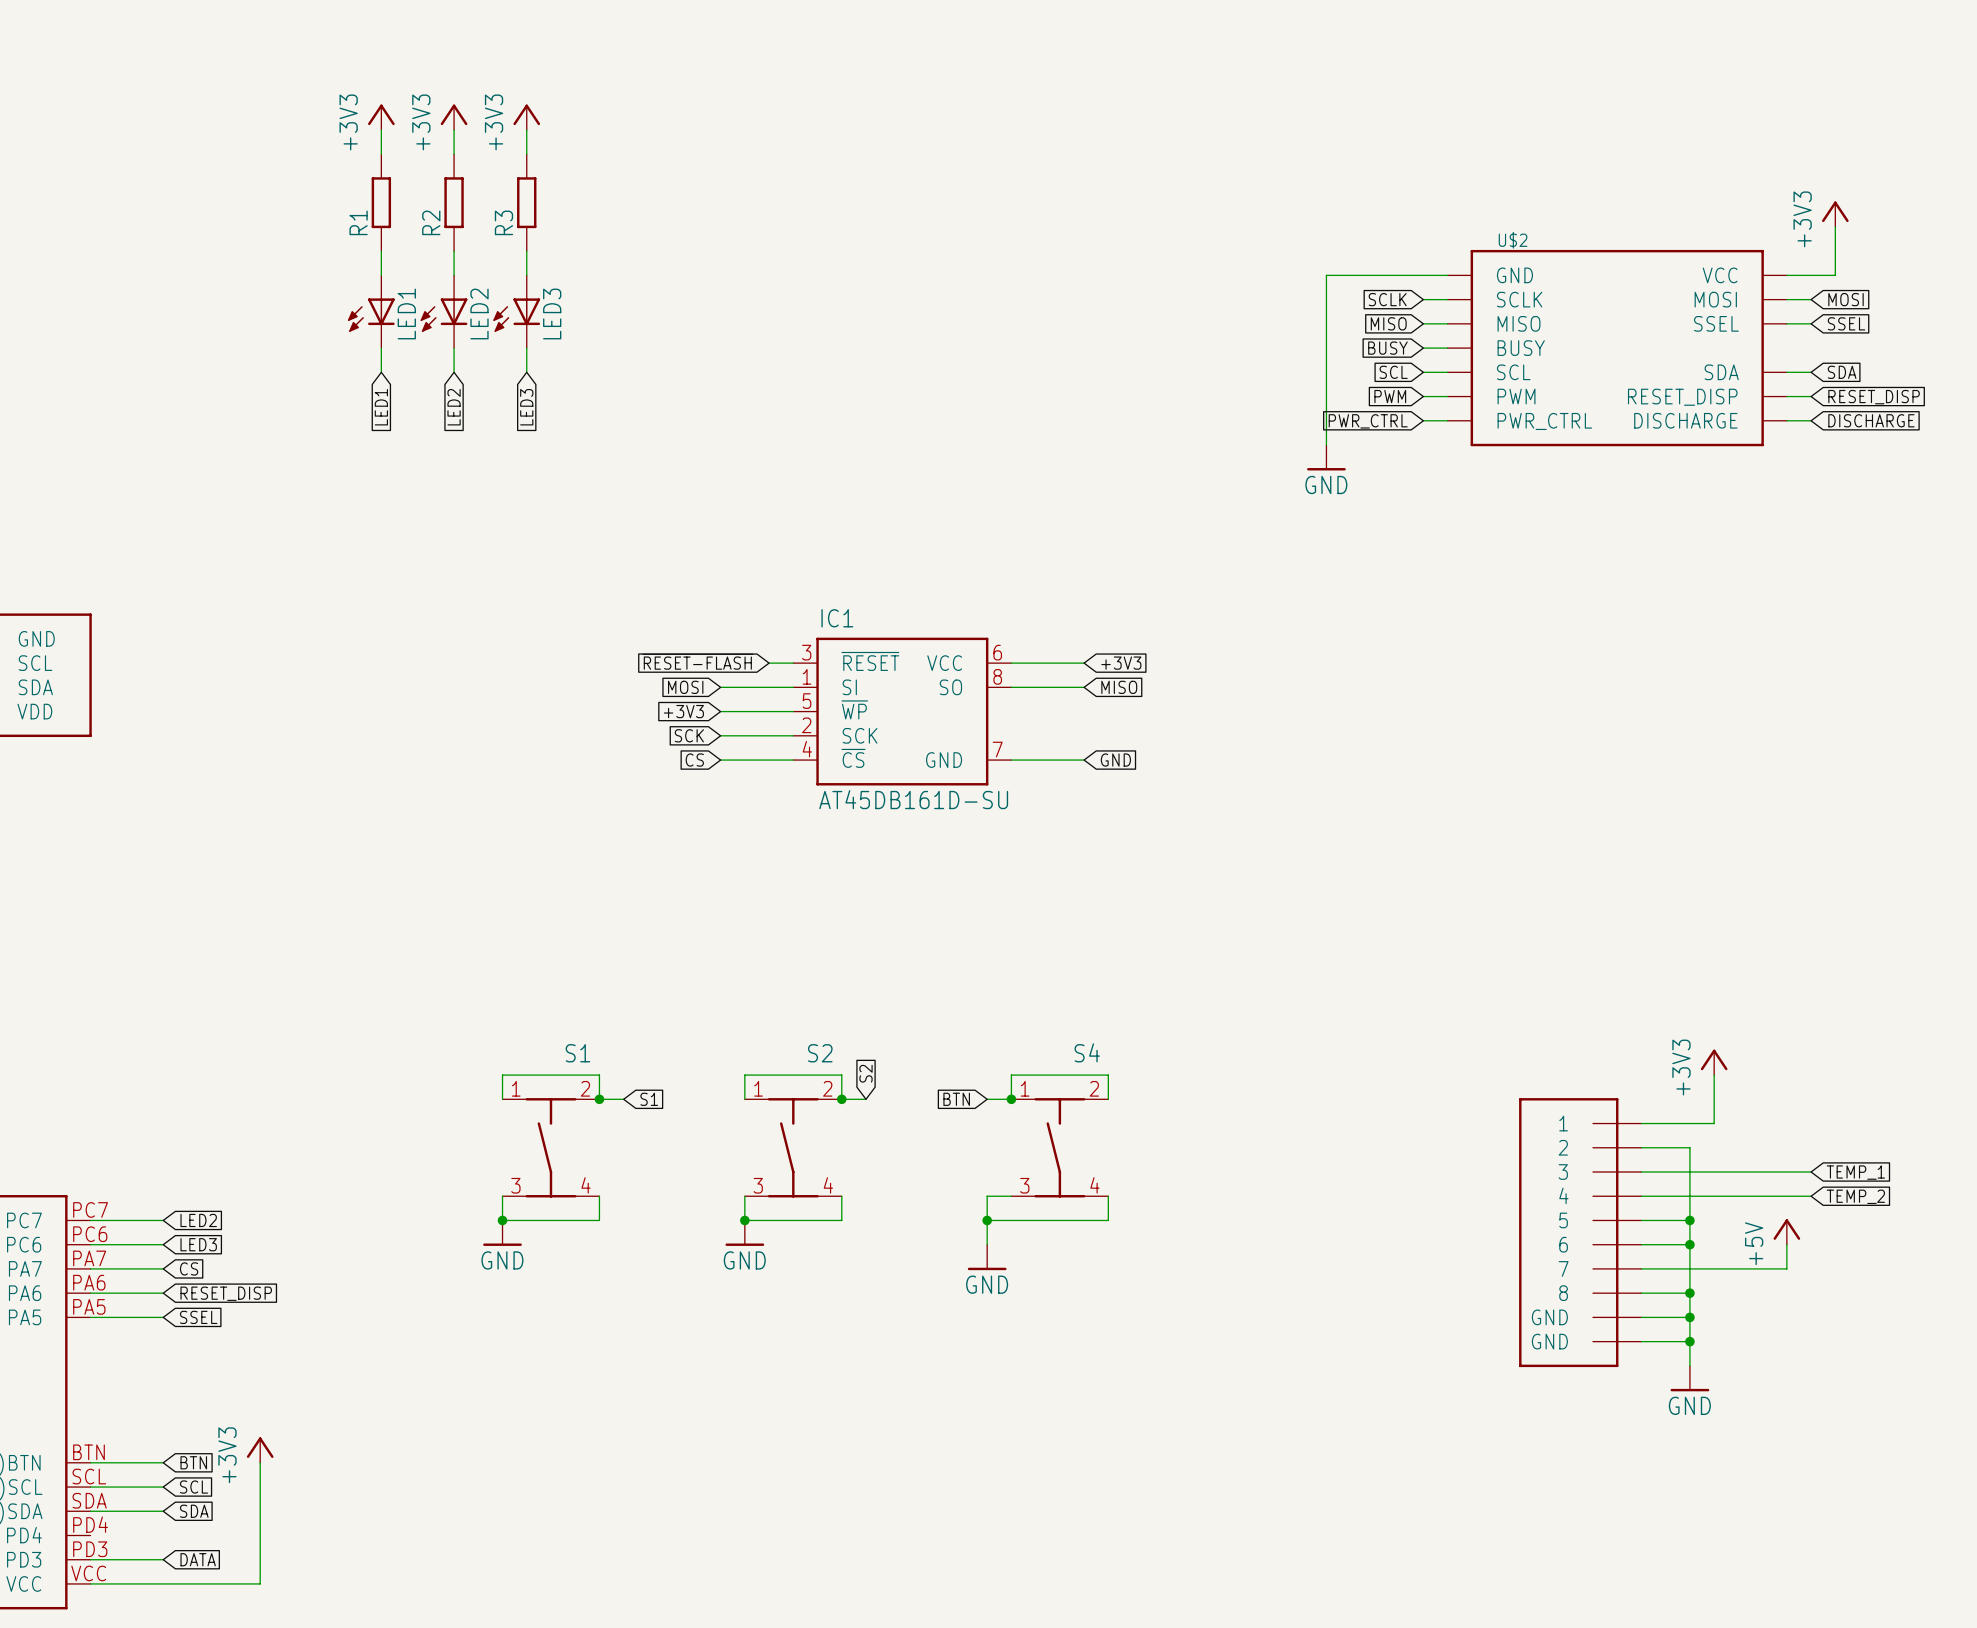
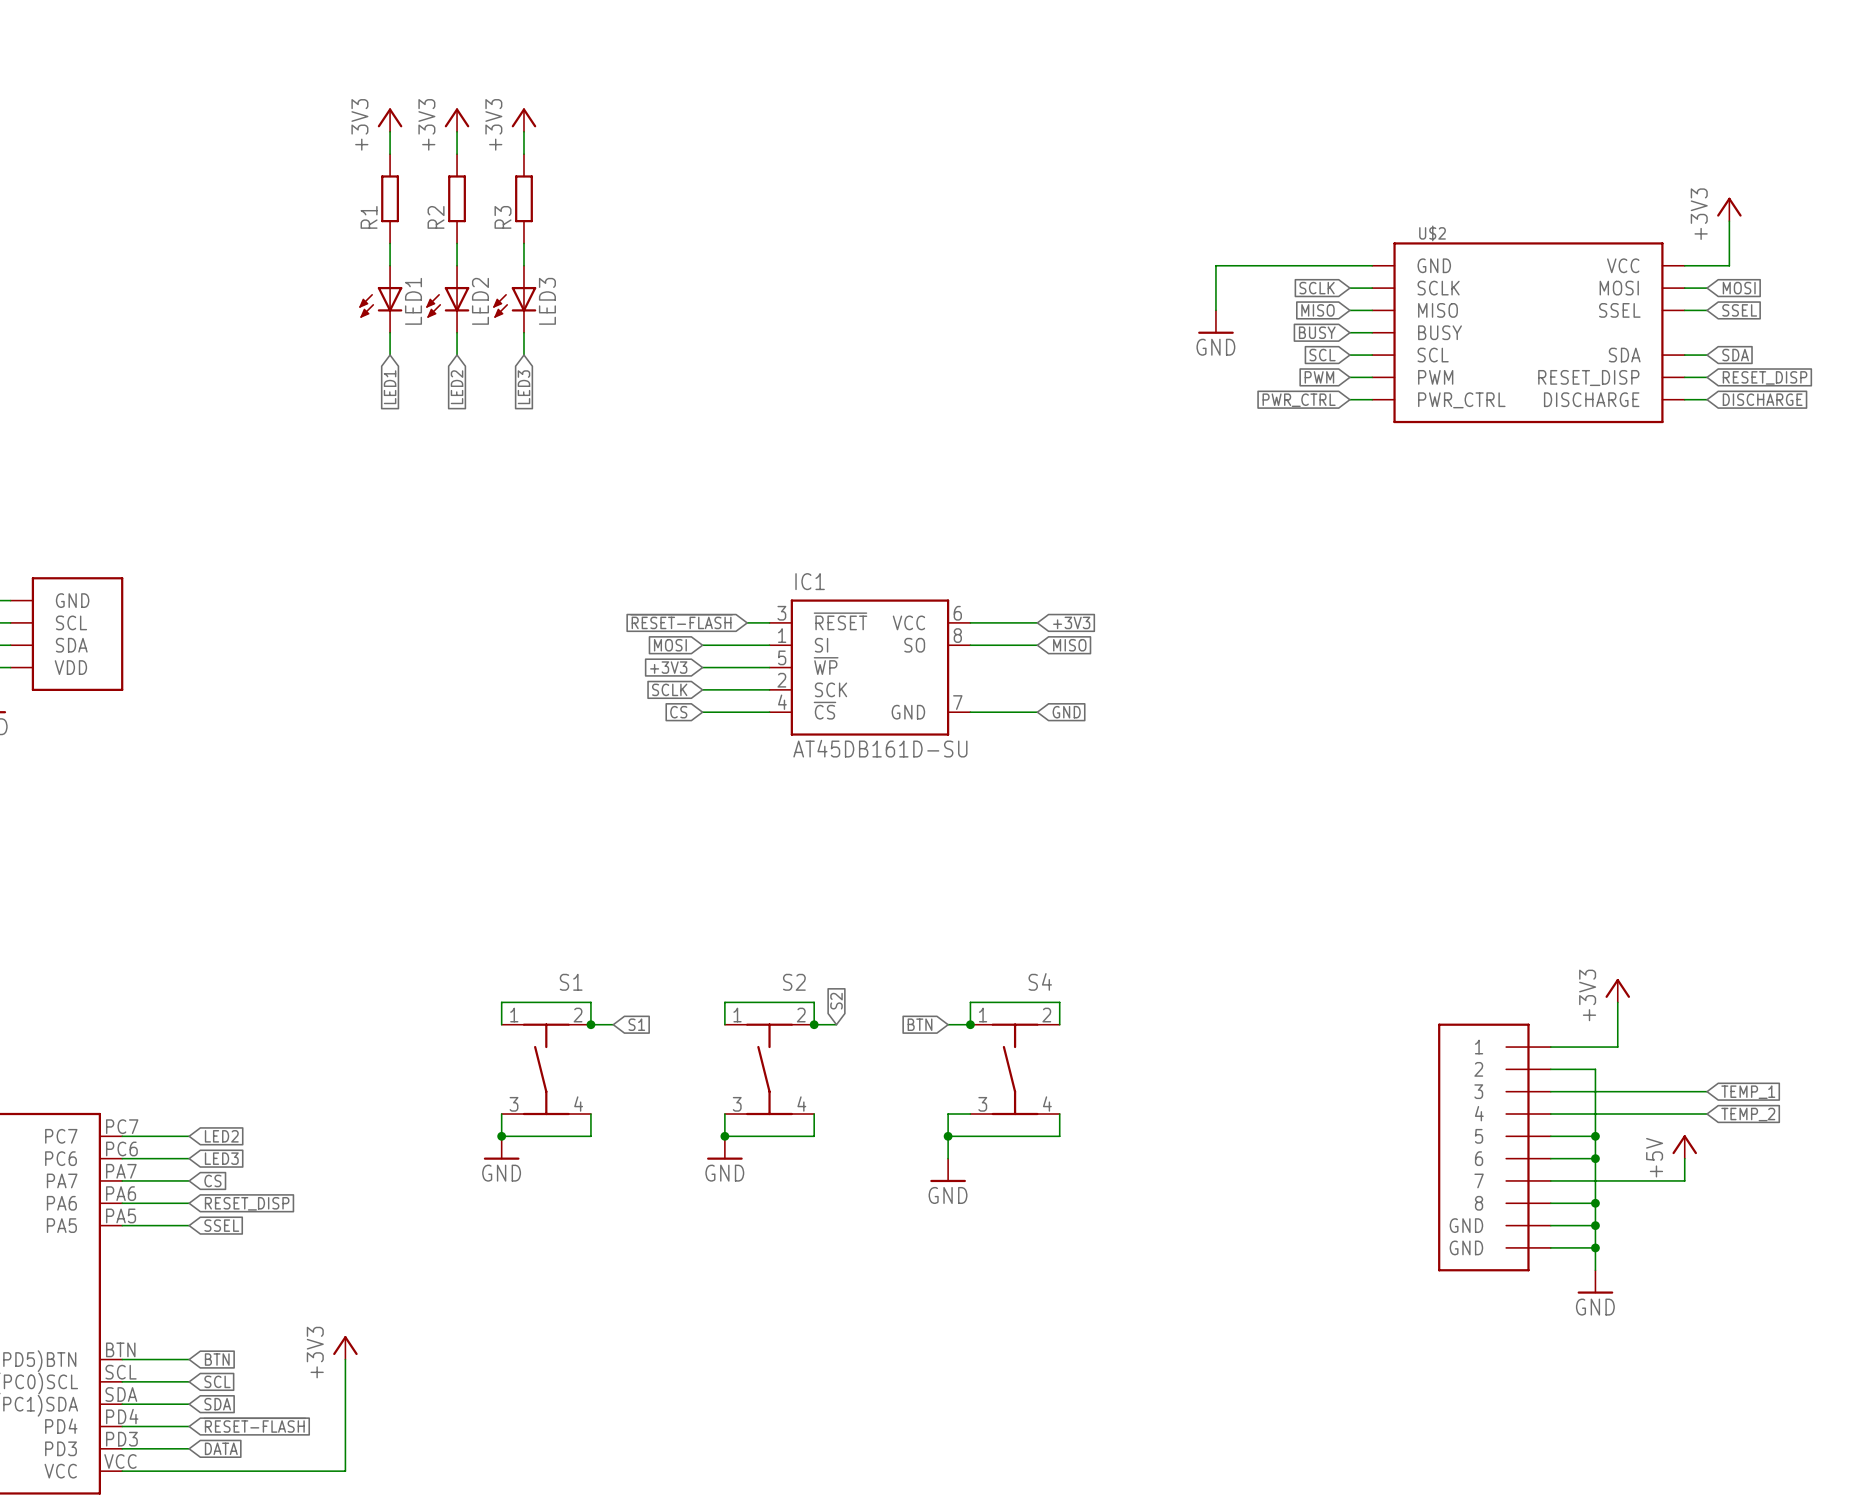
wire: (1326, 275) (1326, 445) -> (1260, 265) (1215, 265) (1215, 310)
power symbol position: GND (1326, 457) -> GND (1215, 322)
global label: SCK (689, 735) -> SCLK (669, 689)
power symbol position: +3V3 (260, 1450) -> +3V3 (345, 1347)
wire: (260, 1462) (260, 1583) -> (345, 1359) (345, 1471) (278, 1471)
global label: none -> ~{RESET-FLASH} (254, 1425)
wire: none -> (122, 1426) (189, 1426)

